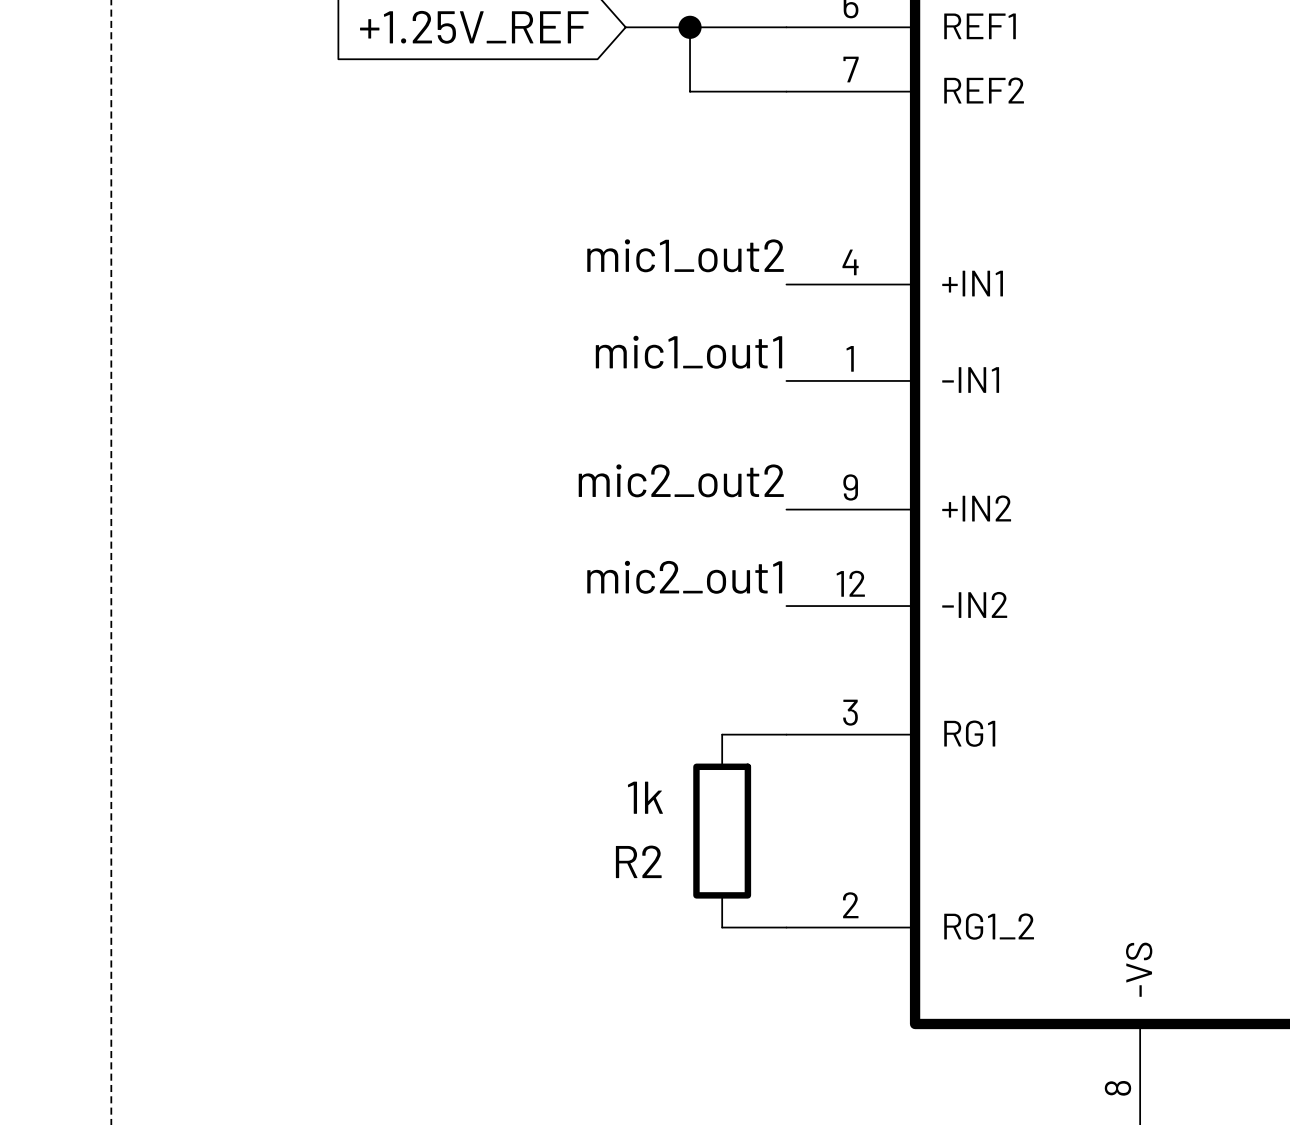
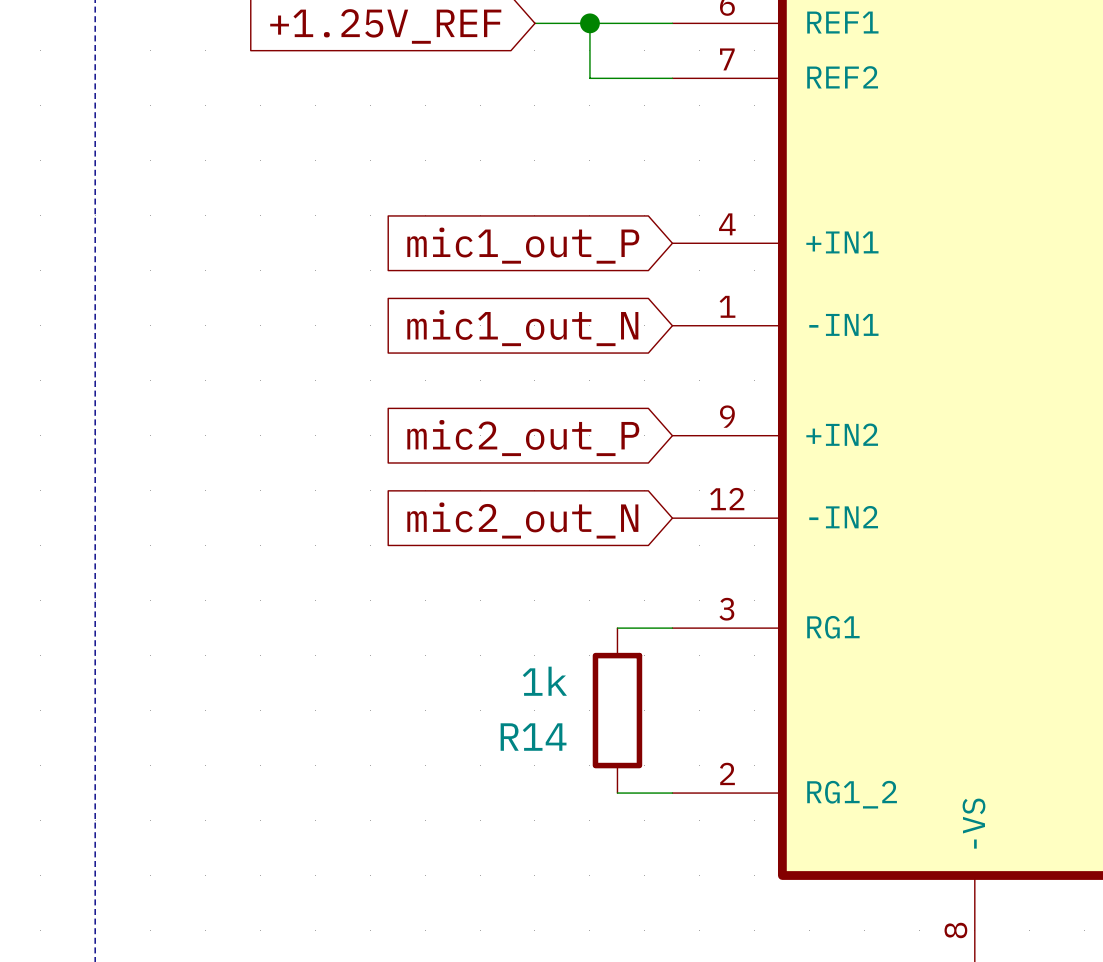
label: mic1_out2 (685, 255) -> none
global label: none -> mic1_out_P (523, 245)
label: mic1_out1 (689, 352) -> none
global label: none -> mic1_out_N (522, 328)
label: mic2_out2 (681, 480) -> none
global label: none -> mic2_out_P (523, 438)
label: mic2_out1 (684, 577) -> none
global label: none -> mic2_out_N (522, 520)
R2 name: R2 (638, 861) -> R14 (533, 737)

